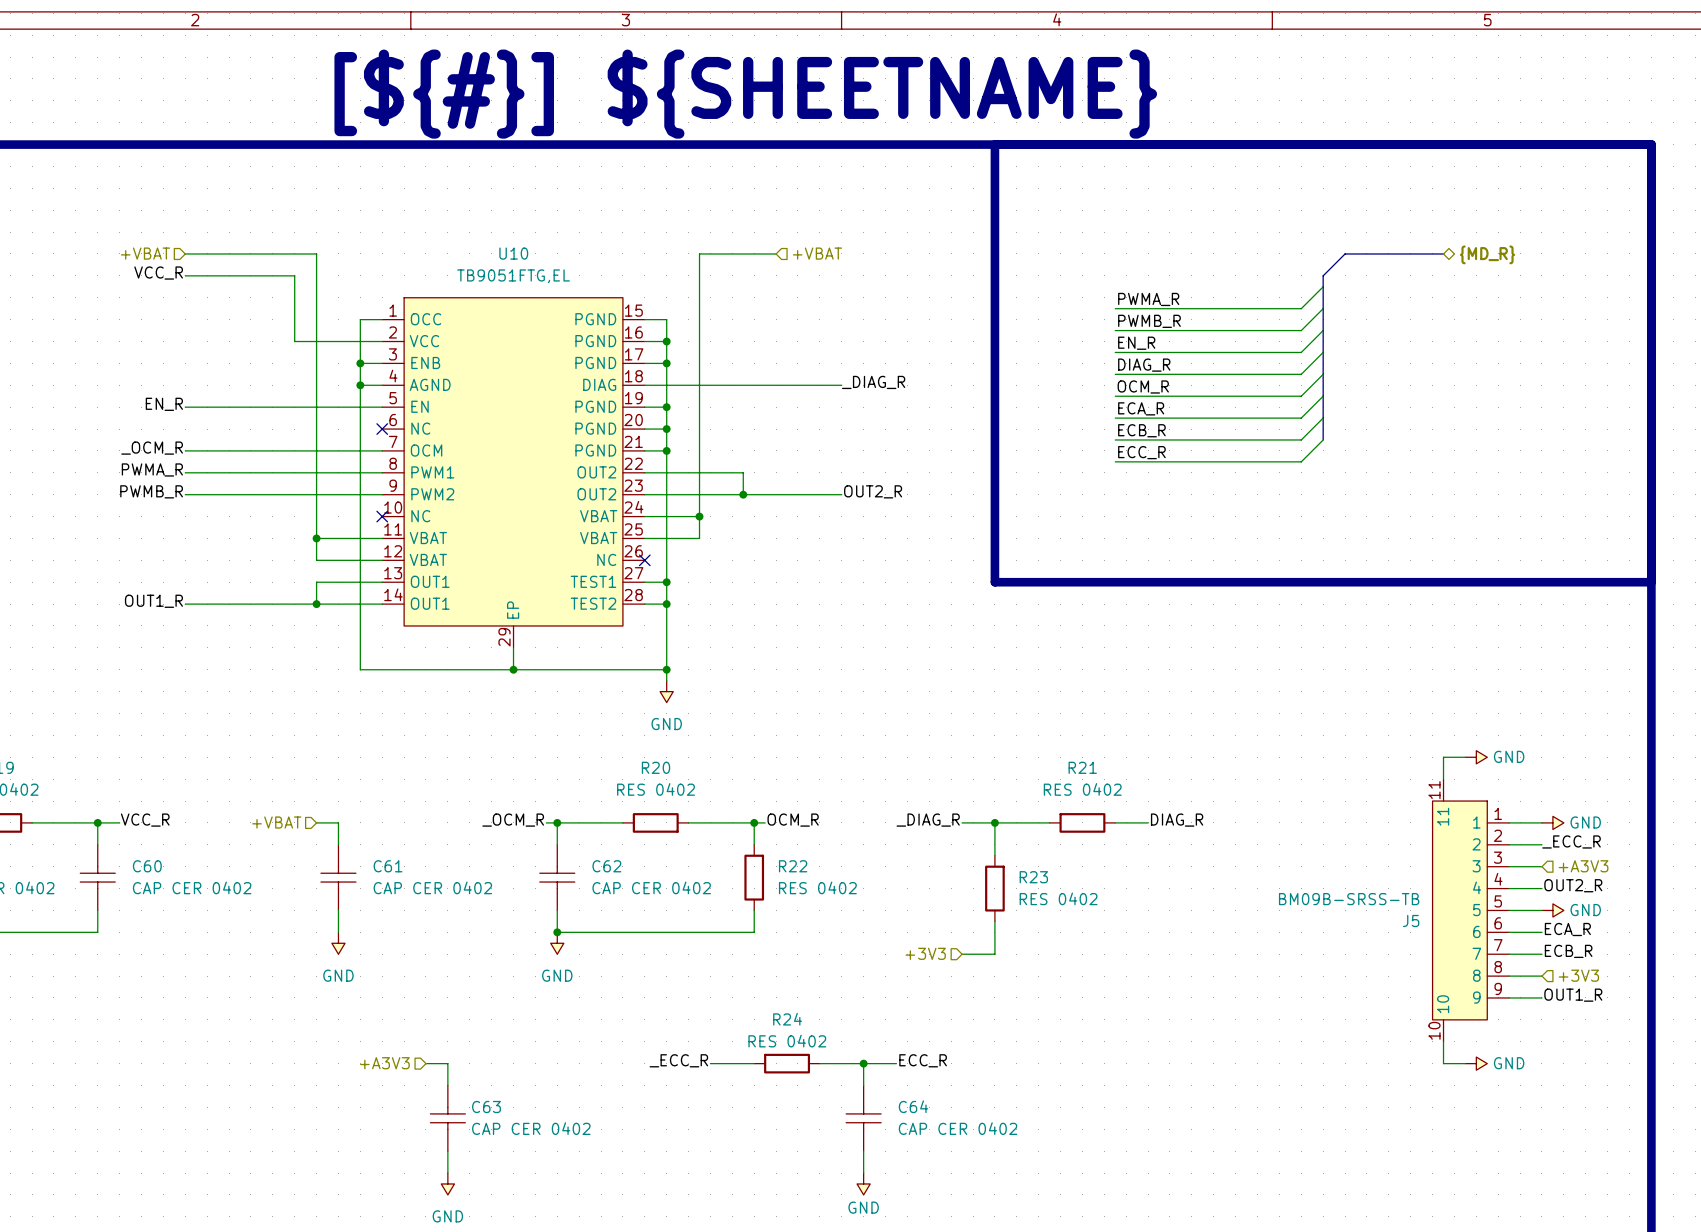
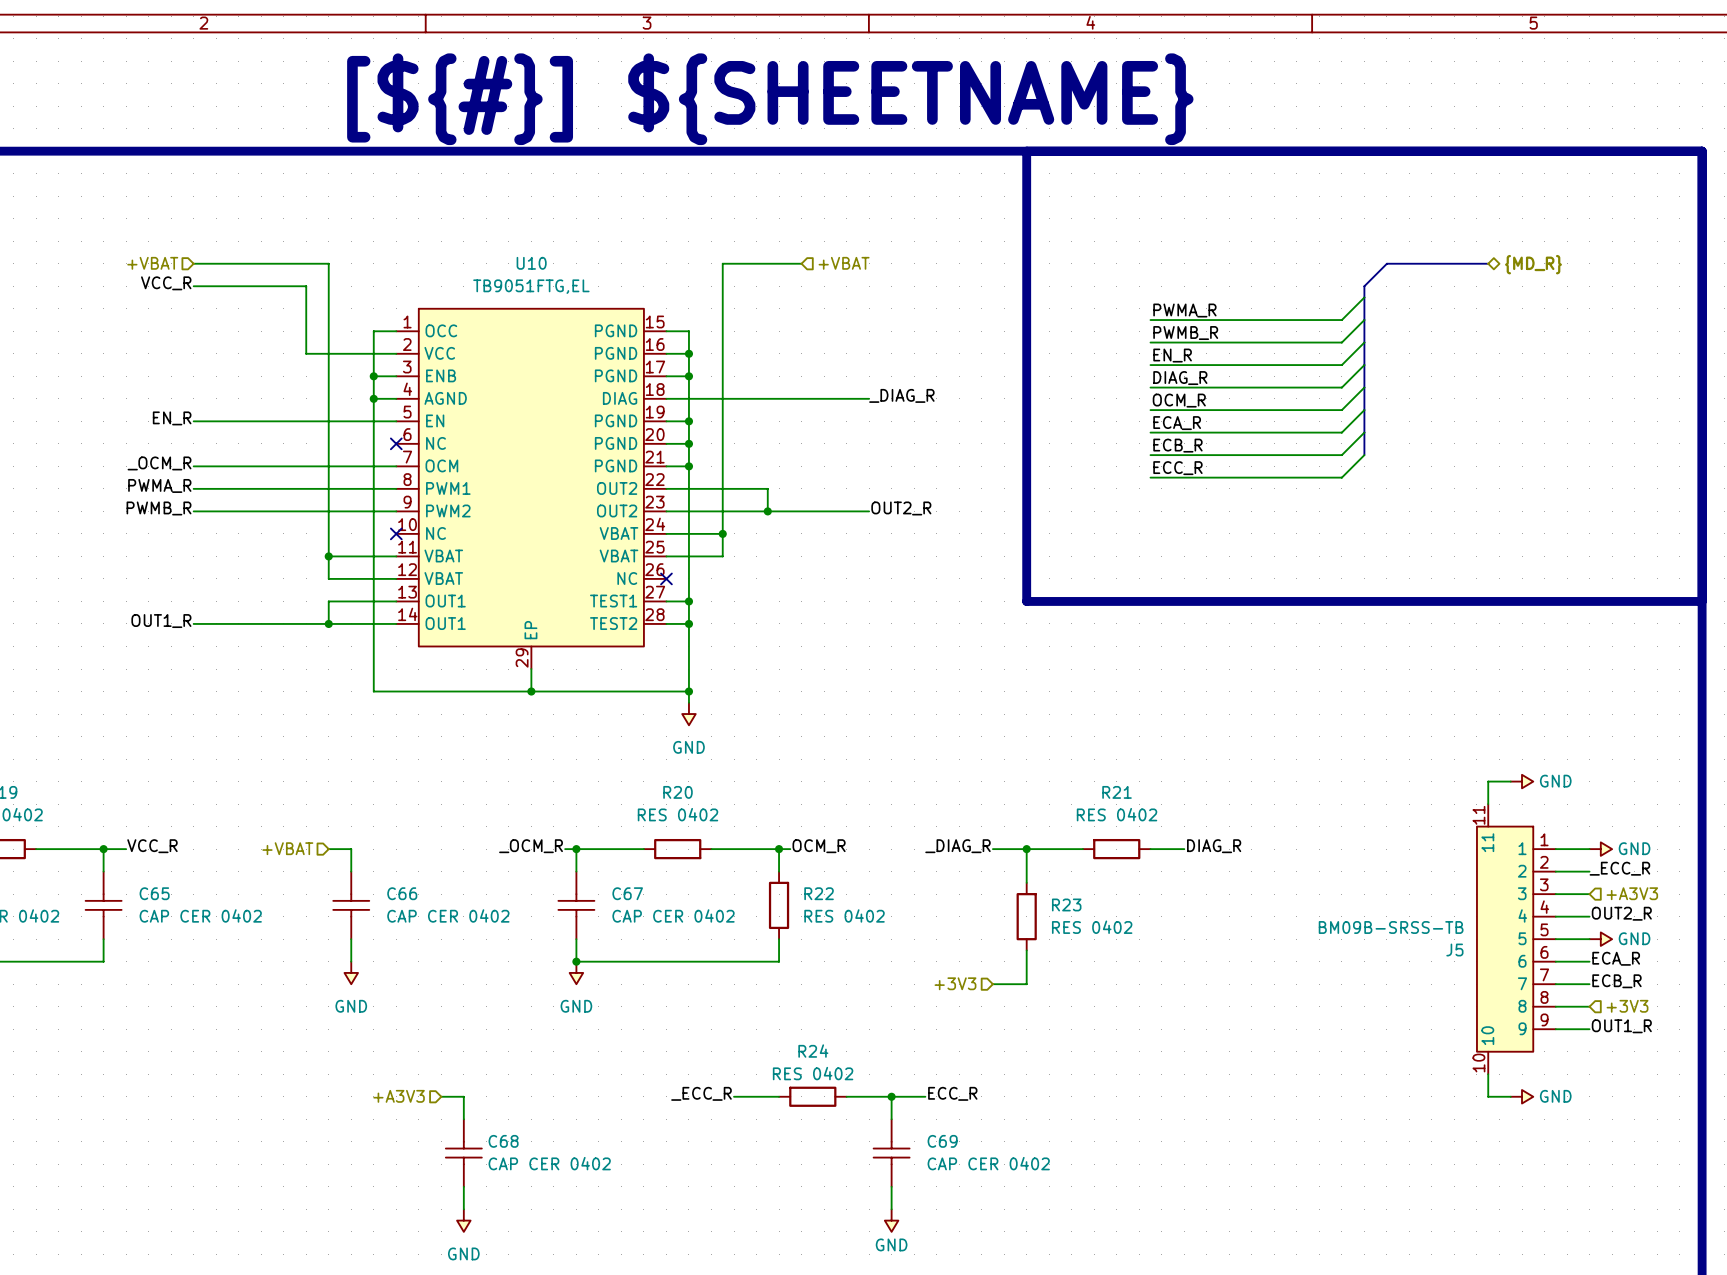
C60 name: C60 (147, 866) -> C65 (154, 893)
C61 name: C61 (388, 866) -> C66 (402, 893)
C62 name: C62 (606, 866) -> C67 (627, 893)
C63 name: C63 (486, 1106) -> C68 (503, 1141)
C64 name: C64 (913, 1106) -> C69 (942, 1141)

